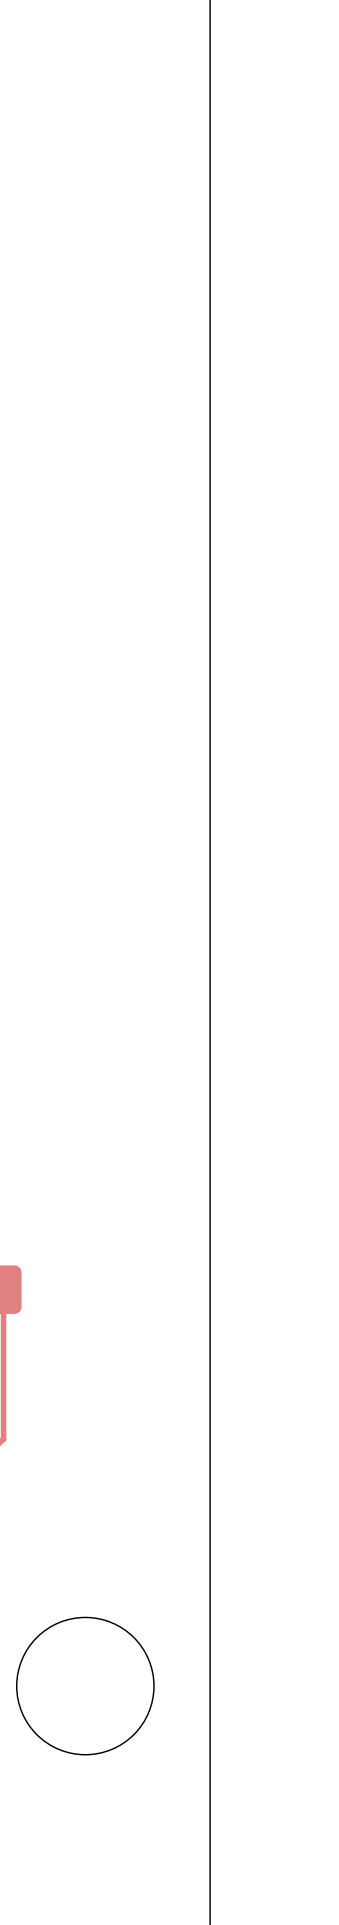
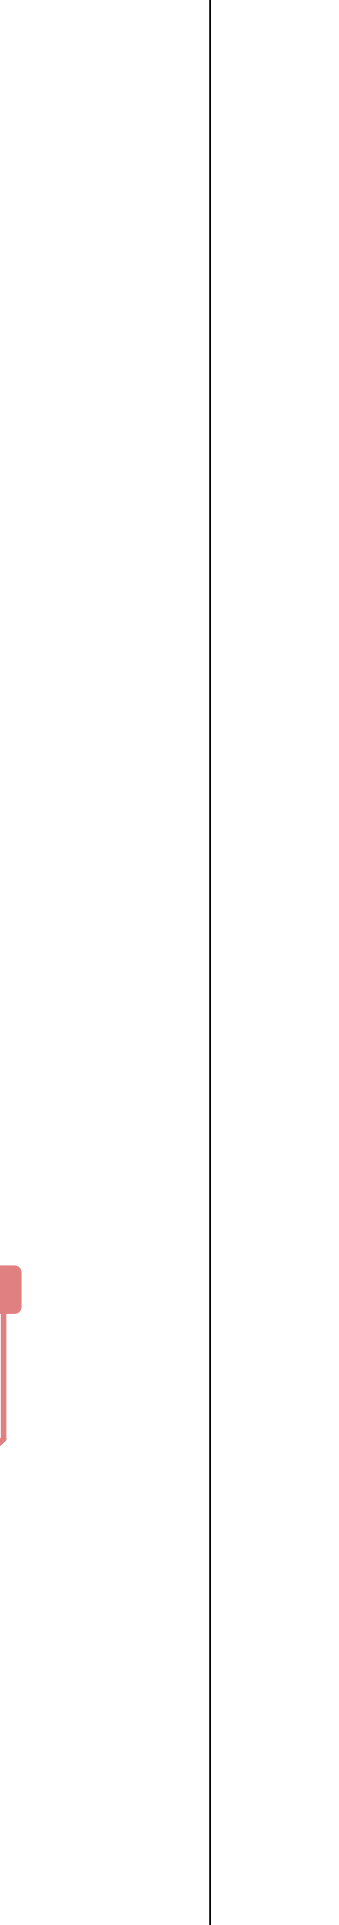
round board edge: [16, 1616, 155, 1756] -> none

